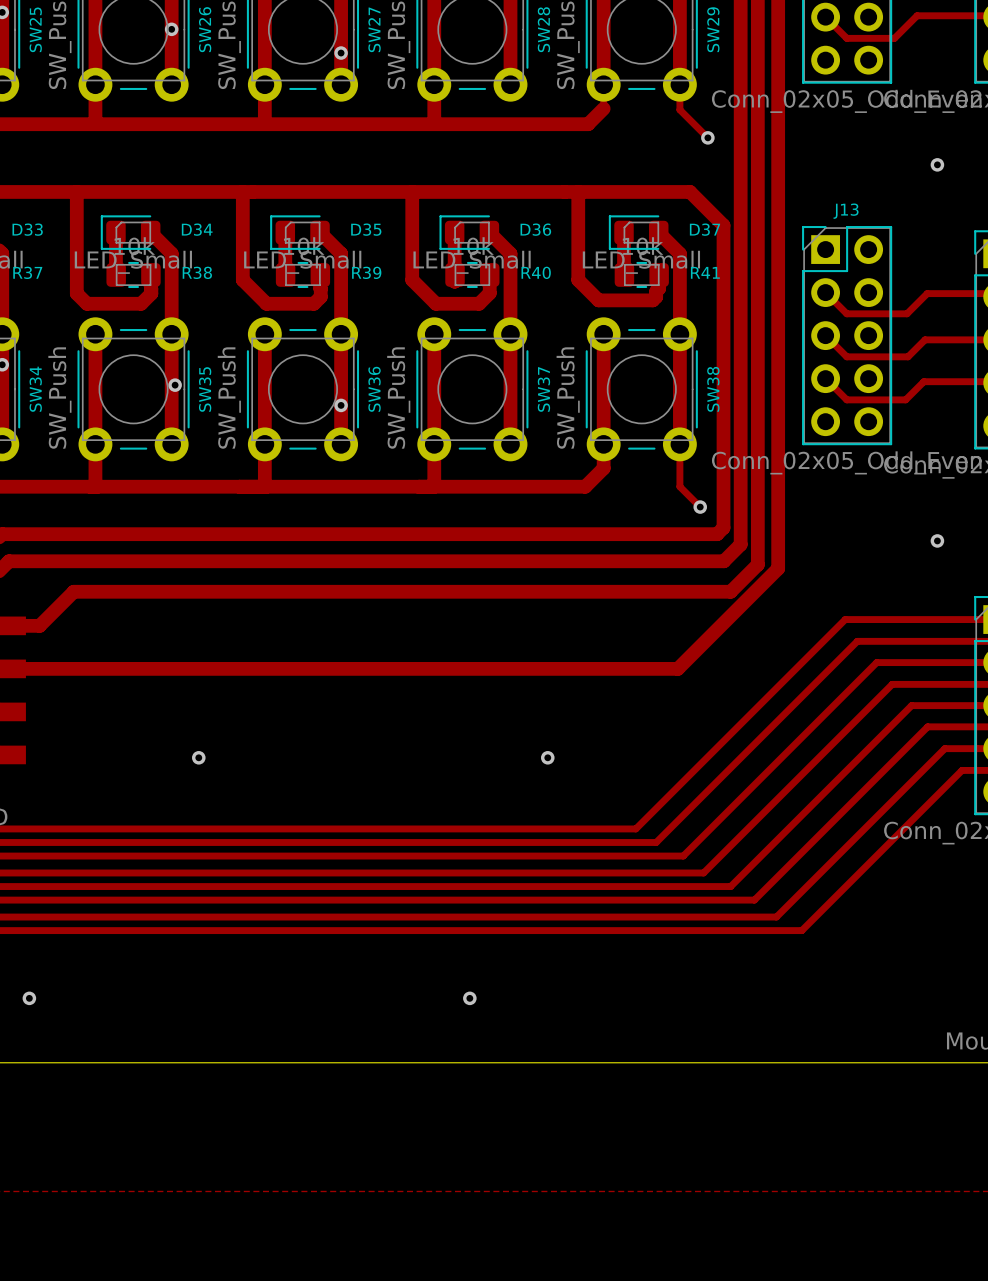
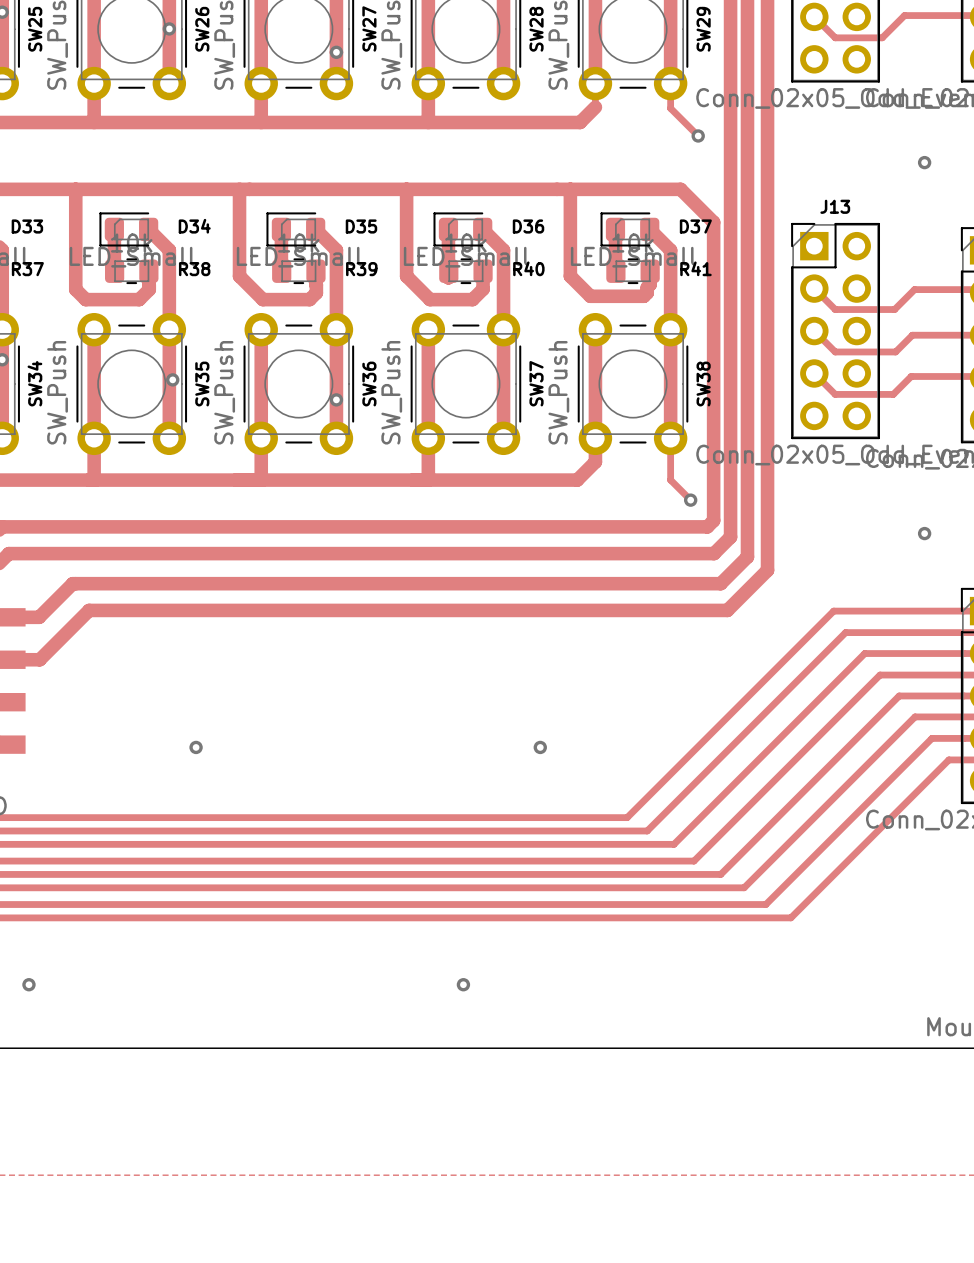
track: (778, 568) (677, 668) (40, 668) -> (767, 560) (767, 570) (727, 610) (89, 610) (39, 659)

